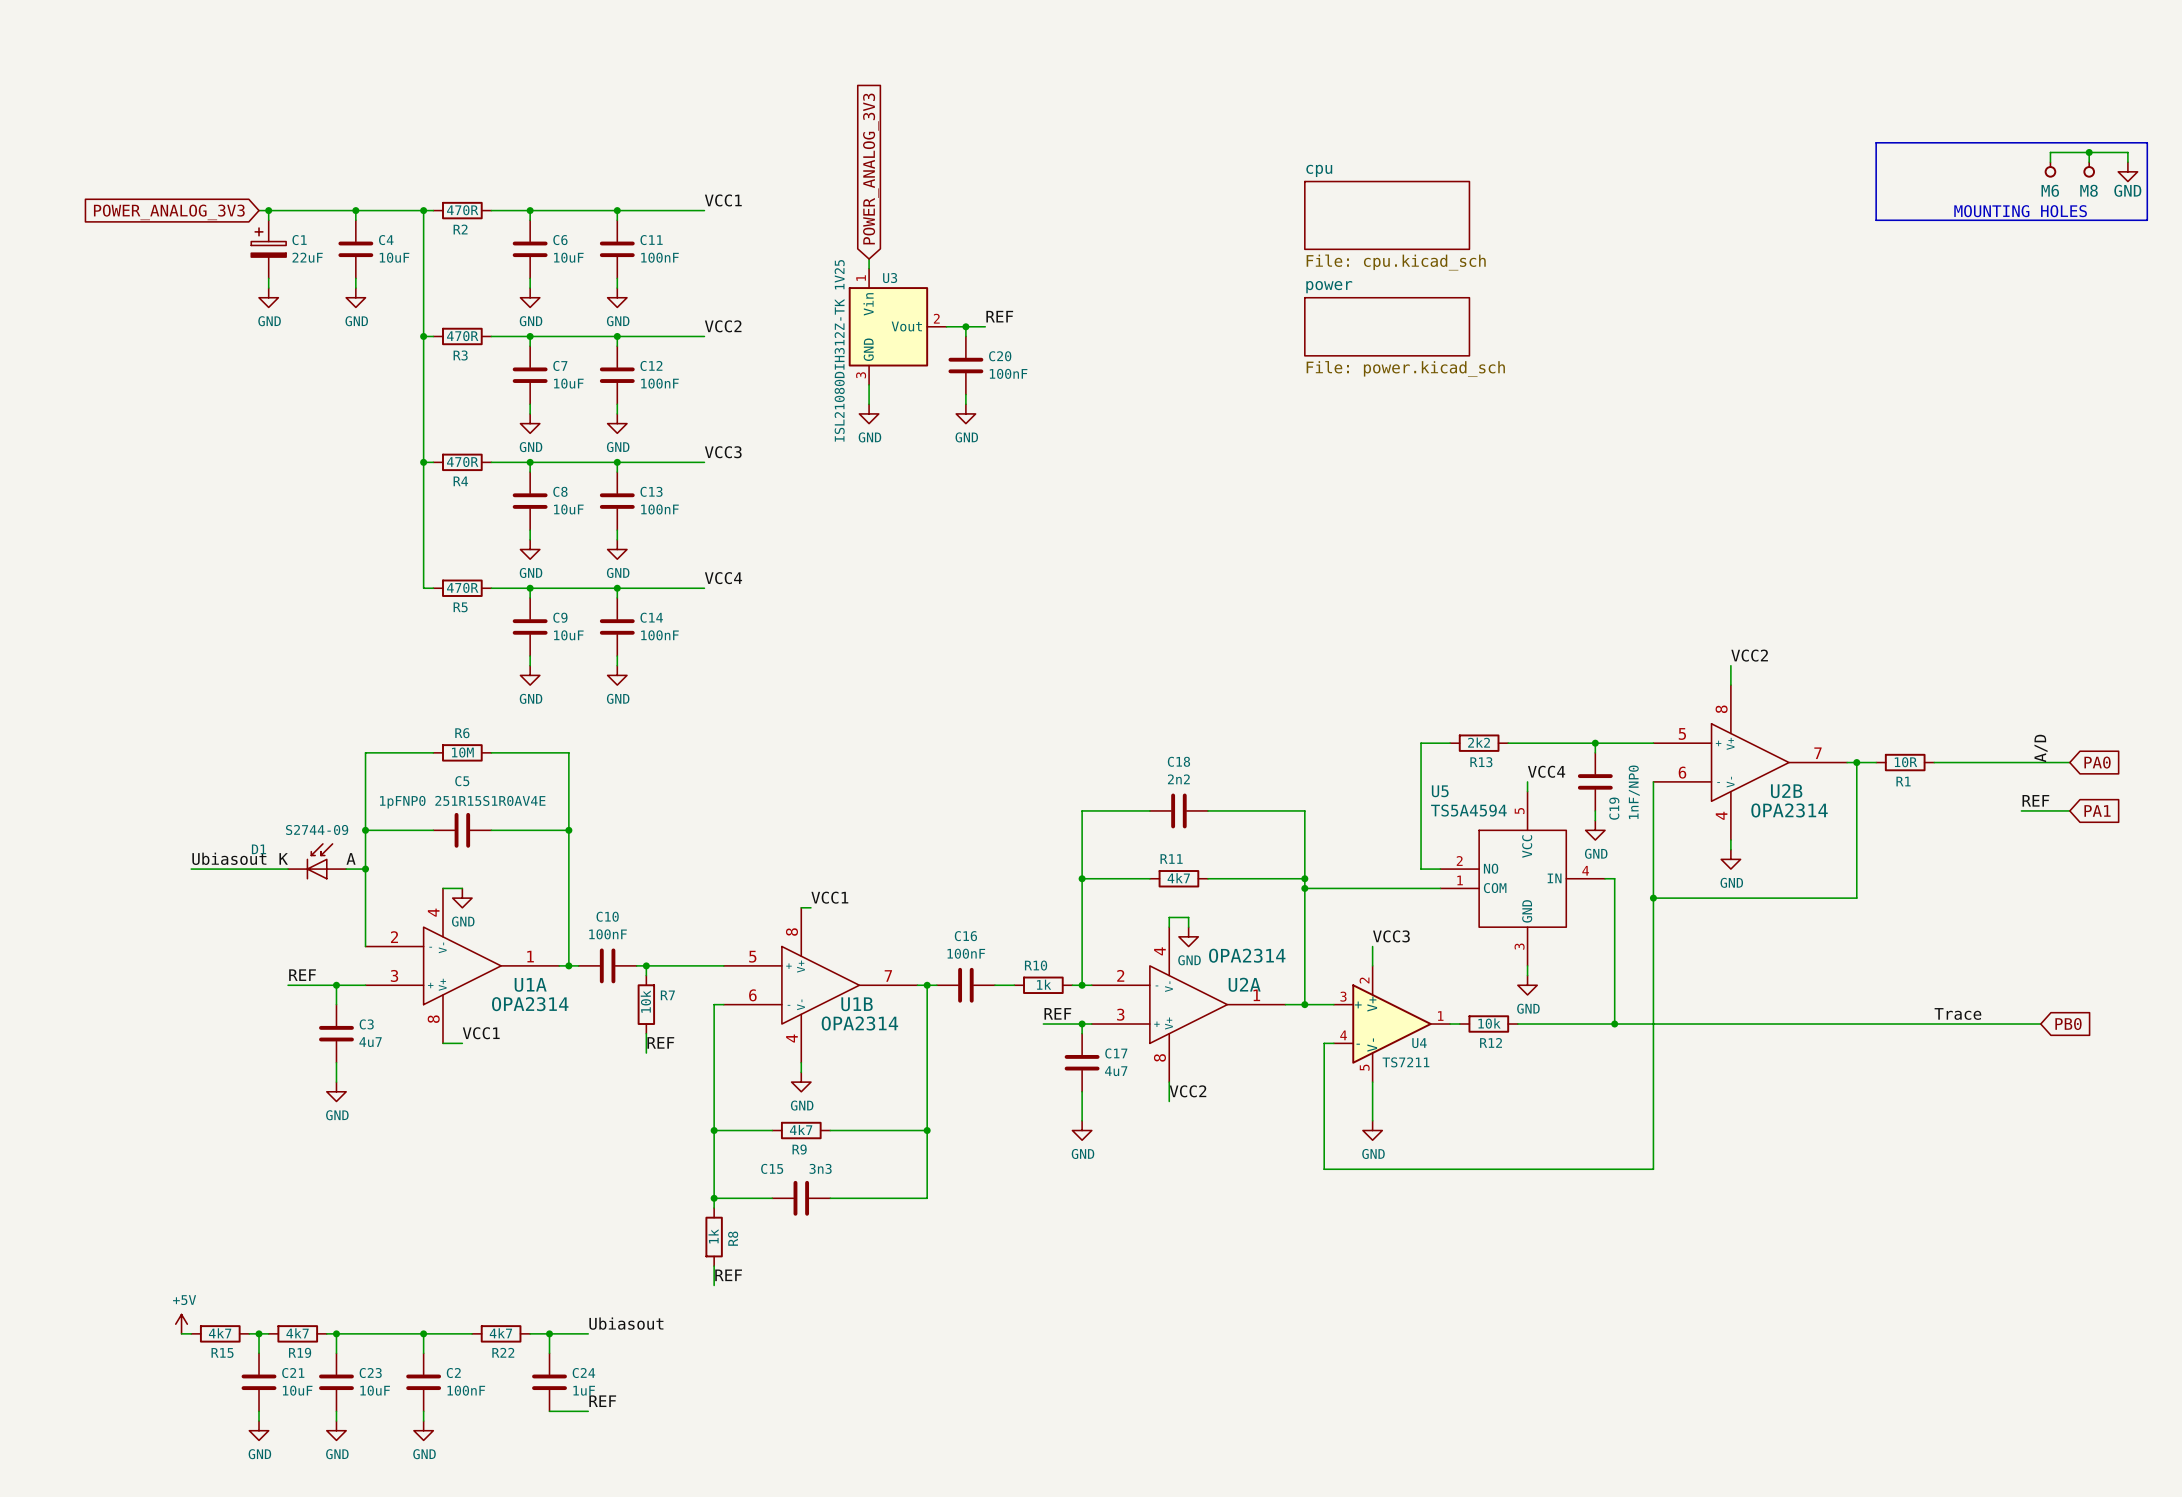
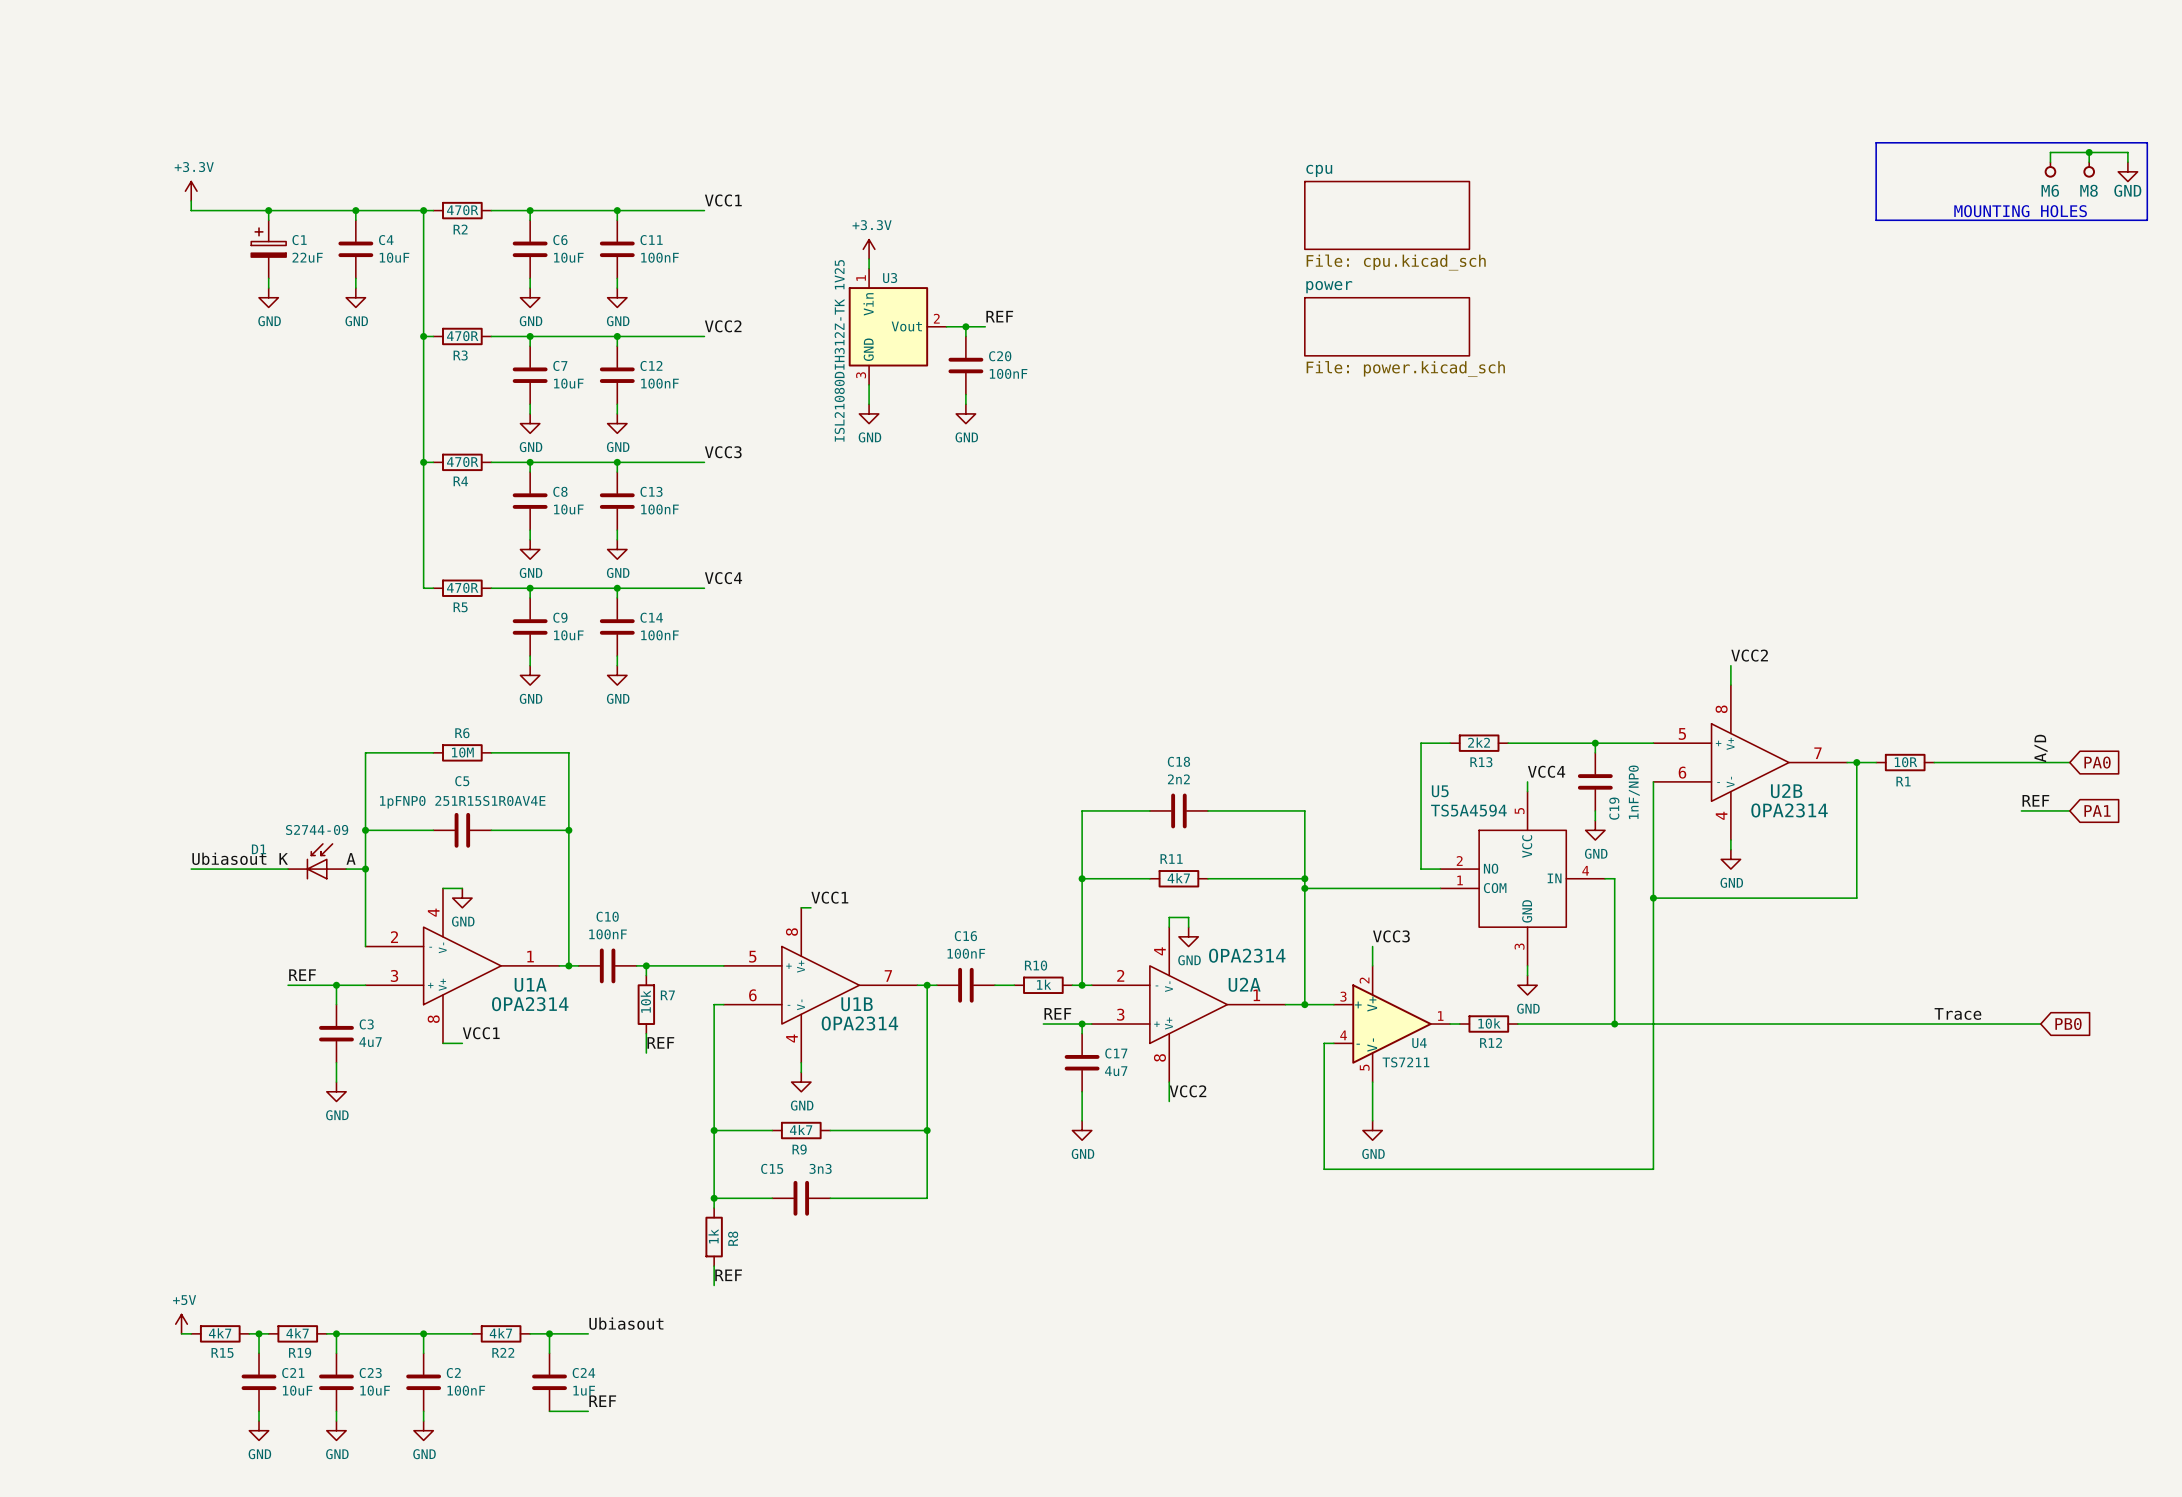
global label: POWER_ANALOG_3V3 (870, 169) -> none
power symbol: none -> +3.3V (191, 191)
wire: none -> (191, 200) (191, 210) (259, 210)
global label: POWER_ANALOG_3V3 (169, 212) -> none
power symbol: none -> +3.3V (869, 249)

